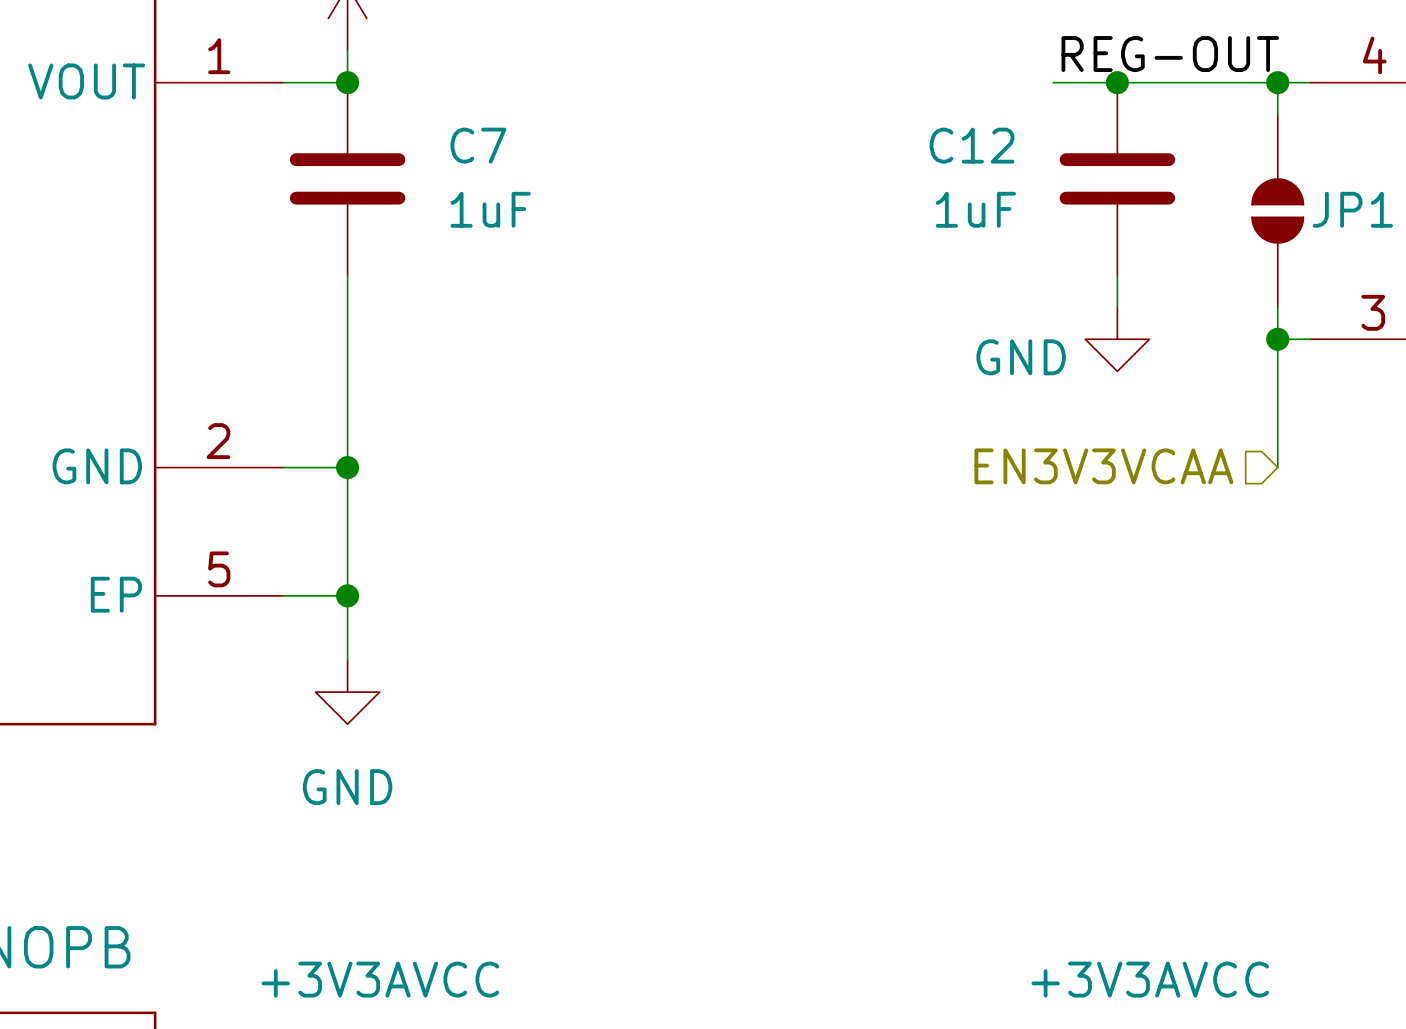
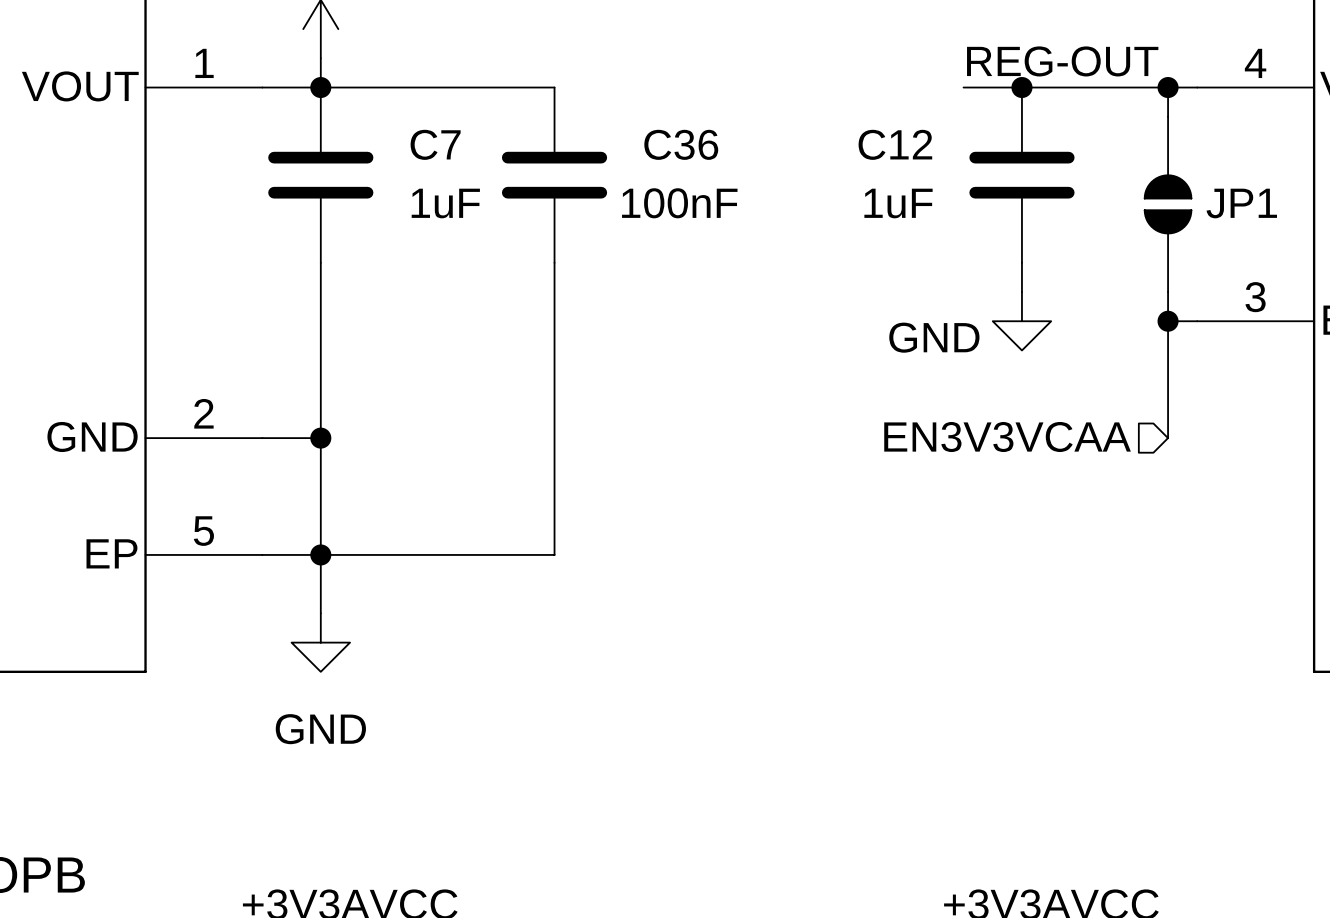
wire: none -> (320, 87) (554, 87)
C36: none -> 100nF (554, 175)
wire: none -> (554, 262) (554, 554) (320, 554)

